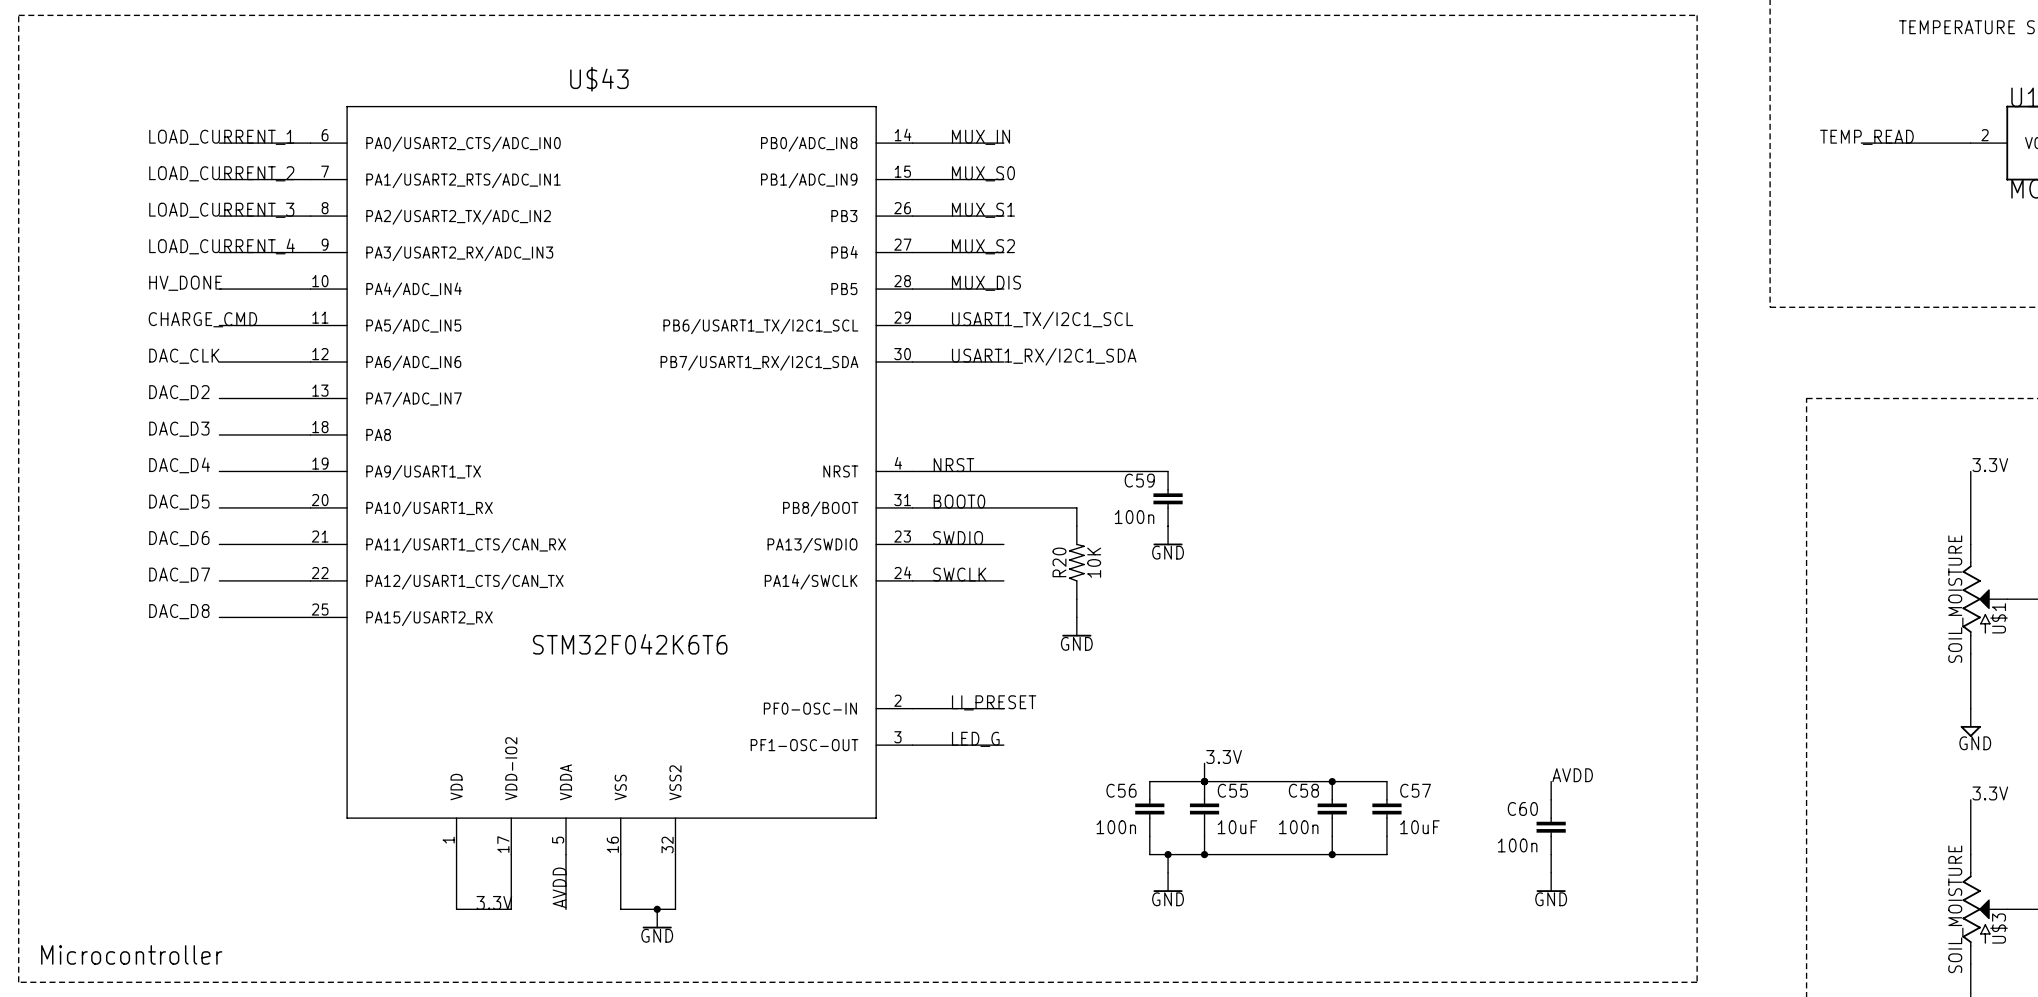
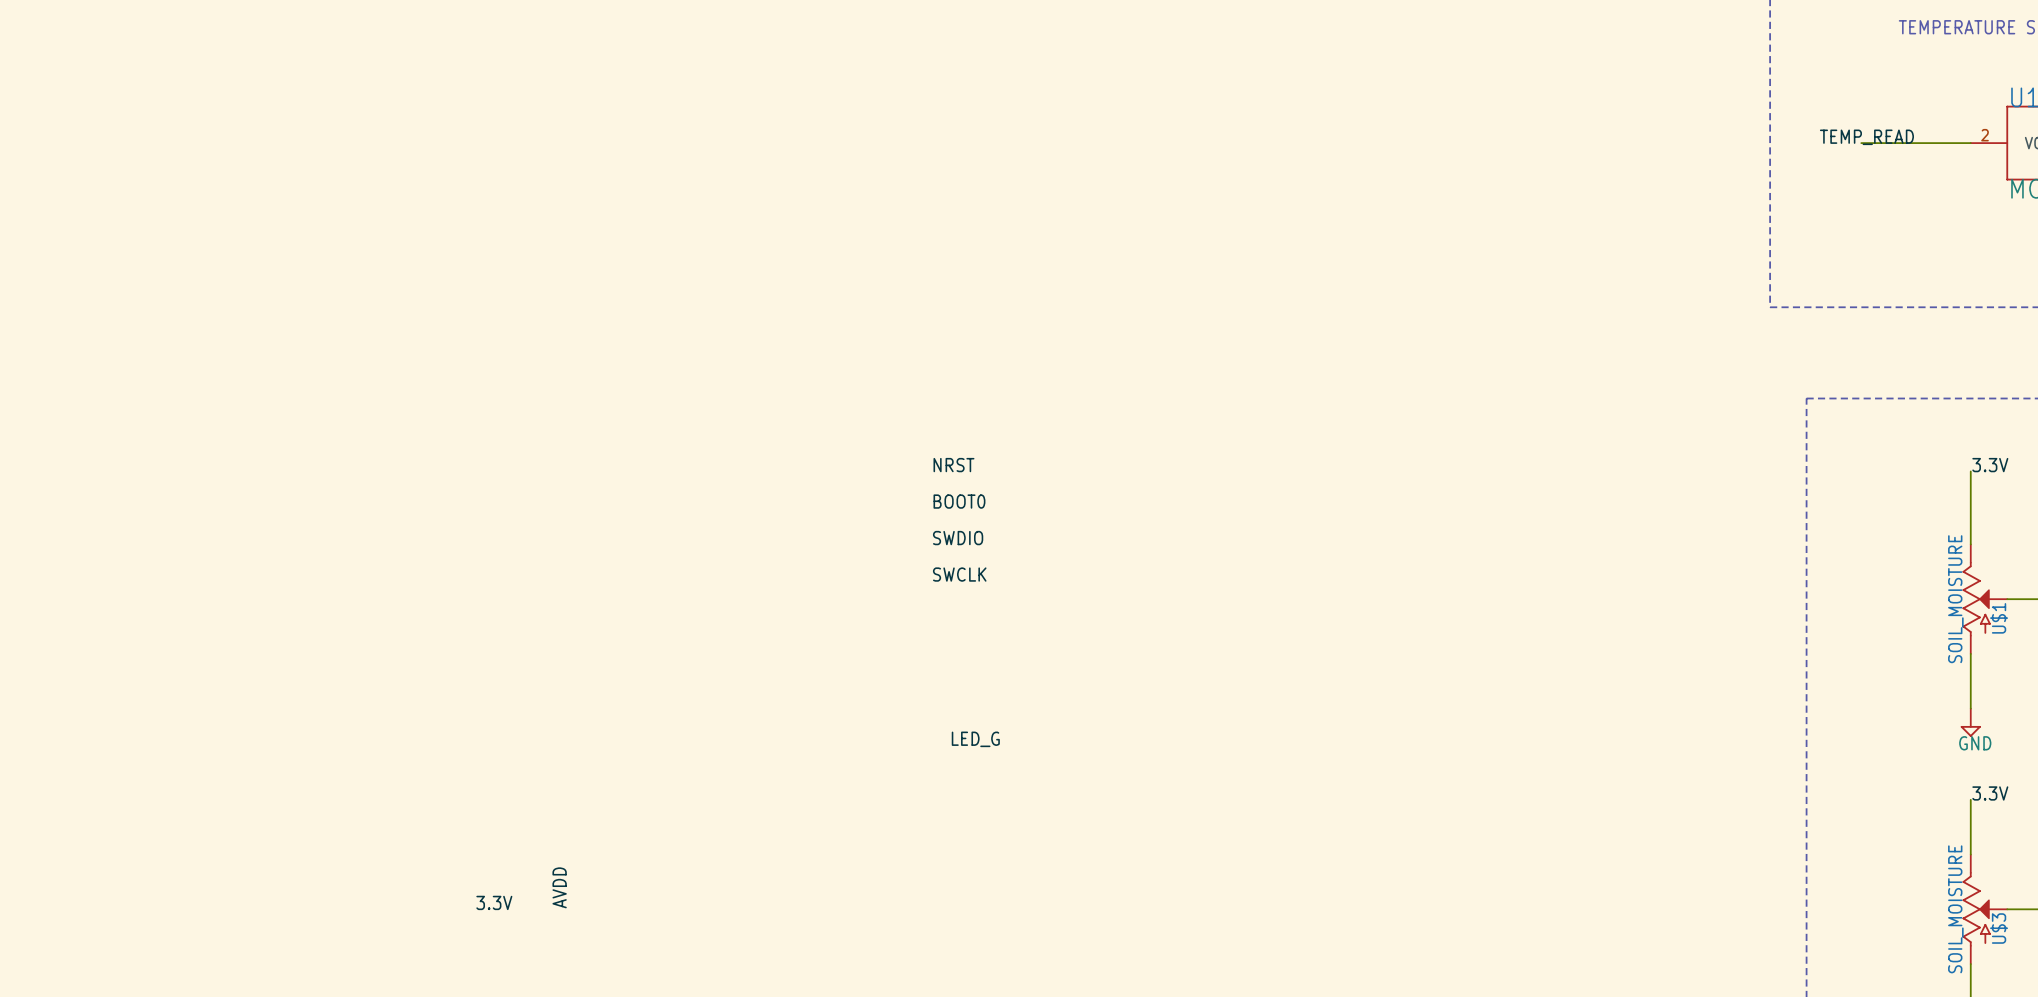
line: (18, 15) (1697, 15) (1697, 982) (18, 982) (18, 15) -> none
label: LOAD_CURRENT_1 (221, 137) -> none
label: MUX_IN (980, 137) -> none
wire: (219, 143) (310, 143) -> none
wire: (912, 143) (1003, 143) -> none
label: LOAD_CURRENT_2 (221, 173) -> none
label: MUX_S0 (983, 173) -> none
wire: (219, 179) (310, 179) -> none
wire: (912, 179) (1003, 179) -> none
label: LOAD_CURRENT_3 (221, 210) -> none
label: MUX_S1 (983, 210) -> none
wire: (219, 216) (310, 216) -> none
wire: (912, 216) (1003, 216) -> none
label: LOAD_CURRENT_4 (222, 246) -> none
label: MUX_S2 (983, 246) -> none
wire: (219, 252) (310, 252) -> none
wire: (912, 252) (1003, 252) -> none
label: HV_DONE (185, 283) -> none
label: MUX_DIS (986, 283) -> none
wire: (219, 289) (310, 289) -> none
wire: (912, 289) (1003, 289) -> none
label: CHARGE_CMD (202, 319) -> none
label: USART1_TX/I2C1_SCL (1042, 320) -> none
wire: (219, 325) (310, 325) -> none
wire: (912, 325) (1003, 325) -> none
label: DAC_CLK (184, 356) -> none
label: USART1_RX/I2C1_SDA (1044, 356) -> none
wire: (219, 362) (310, 362) -> none
wire: (912, 362) (1003, 362) -> none
label: DAC_D2 (179, 392) -> none
wire: (219, 398) (310, 398) -> none
label: DAC_D3 (179, 429) -> none
wire: (219, 434) (310, 434) -> none
label: DAC_D4 (179, 465) -> none
wire: (219, 471) (310, 471) -> none
wire: (912, 471) (1168, 471) -> none
U$43: STM32F042K6T6 (611, 480) -> none
C59: 100n (1168, 498) -> none
label: DAC_D5 (179, 502) -> none
wire: (219, 507) (310, 507) -> none
wire: (912, 507) (1076, 507) (1076, 526) -> none
power symbol: GND (1168, 535) -> none
label: DAC_D6 (179, 538) -> none
wire: (219, 544) (310, 544) -> none
wire: (912, 544) (1003, 544) -> none
R20: 10K (1076, 562) -> none
label: DAC_D7 (179, 575) -> none
wire: (219, 580) (310, 580) -> none
wire: (912, 580) (1003, 580) -> none
wire: (1076, 599) (1076, 617) -> none
label: DAC_D8 (179, 611) -> none
wire: (219, 617) (310, 617) -> none
power symbol: GND (1076, 627) -> none
label: LI_PRESET (994, 702) -> none
wire: (912, 708) (1003, 708) -> none
wire: (912, 745) (1003, 745) -> none
label: 3.3V (1224, 756) -> none
wire: (1204, 763) (1204, 781) -> none
label: AVDD (1572, 775) -> none
wire: (1149, 781) (1386, 781) -> none
junction: (1204, 781) -> none
junction: (1332, 781) -> none
wire: (1551, 781) (1551, 799) -> none
C56: 100n (1149, 808) -> none
C55: 10uF (1204, 808) -> none
C58: 100n (1332, 808) -> none
C57: 10uF (1386, 808) -> none
C60: 100n (1551, 827) -> none
wire: (1149, 836) (1149, 854) (1386, 854) (1386, 836) -> none
wire: (1204, 836) (1204, 854) -> none
wire: (1332, 836) (1332, 854) -> none
wire: (456, 854) (456, 909) (511, 909) (511, 854) -> none
wire: (566, 854) (566, 909) -> none
wire: (620, 854) (620, 909) (675, 909) (675, 854) -> none
wire: (1168, 854) (1168, 872) -> none
junction: (1168, 854) -> none
junction: (1204, 854) -> none
junction: (1332, 854) -> none
wire: (1551, 854) (1551, 872) -> none
power symbol: GND (1168, 882) -> none
power symbol: GND (1551, 882) -> none
junction: (657, 909) -> none
power symbol: GND (657, 918) -> none
text: Microcontroller (131, 954) -> none

